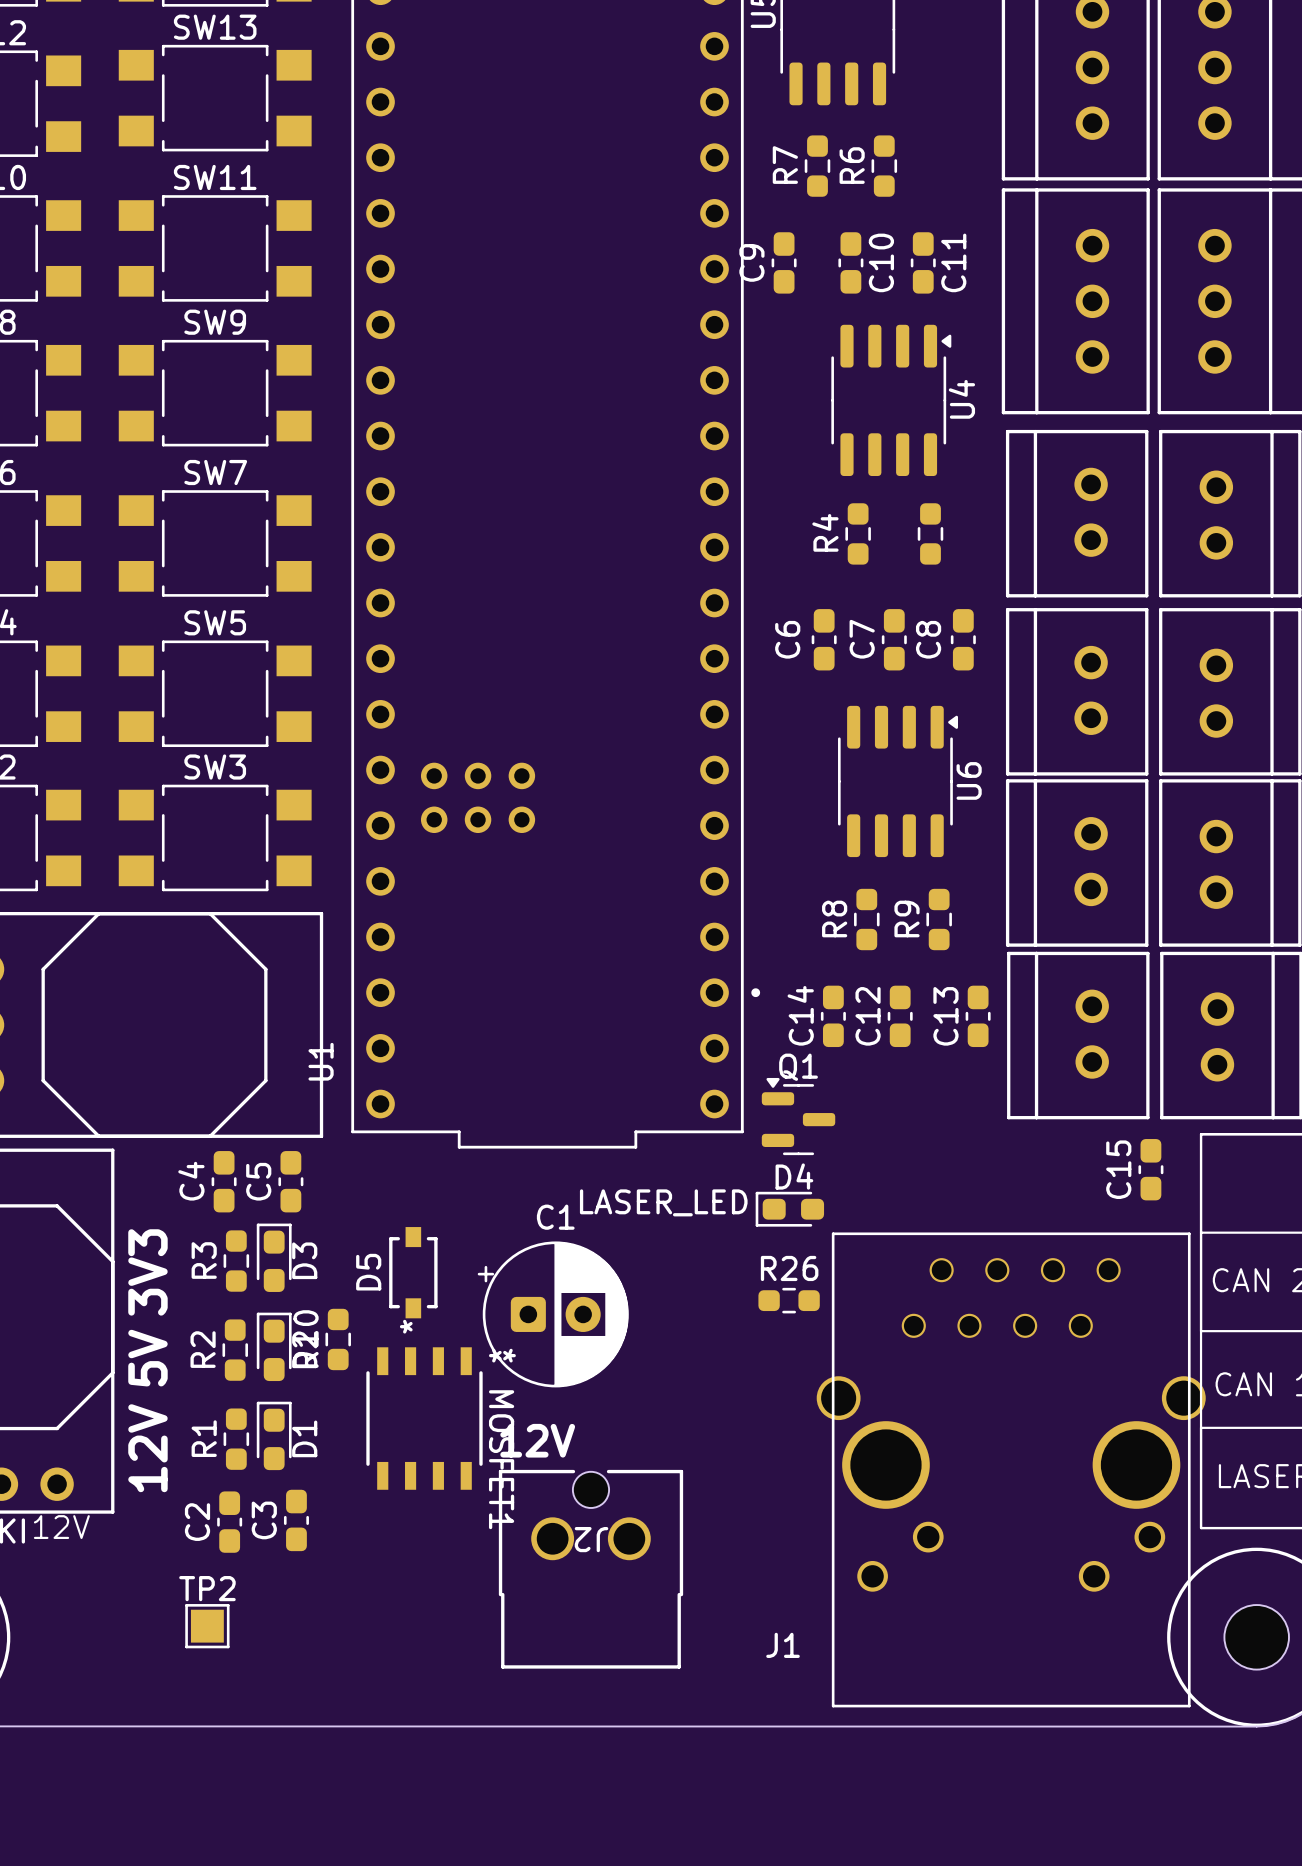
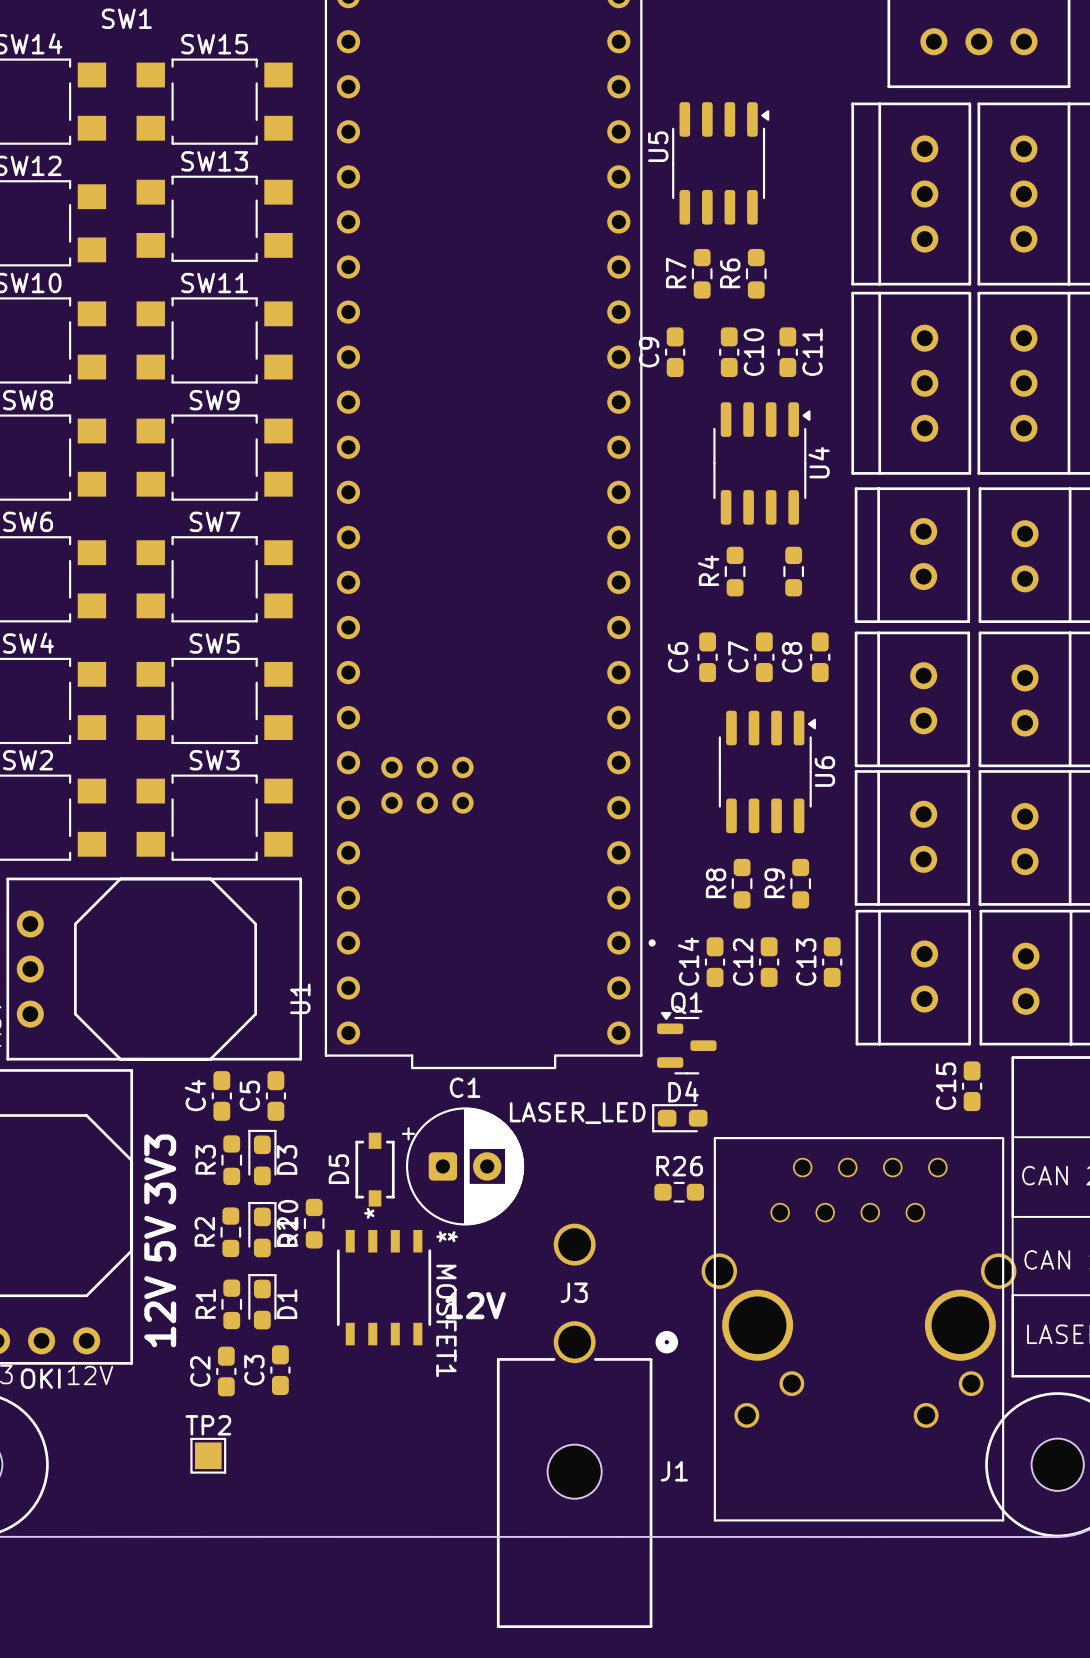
C1 position: (553, 1314) -> (463, 1166)
J2: (590, 1569) -> none
J3: none -> (587, 1425)

